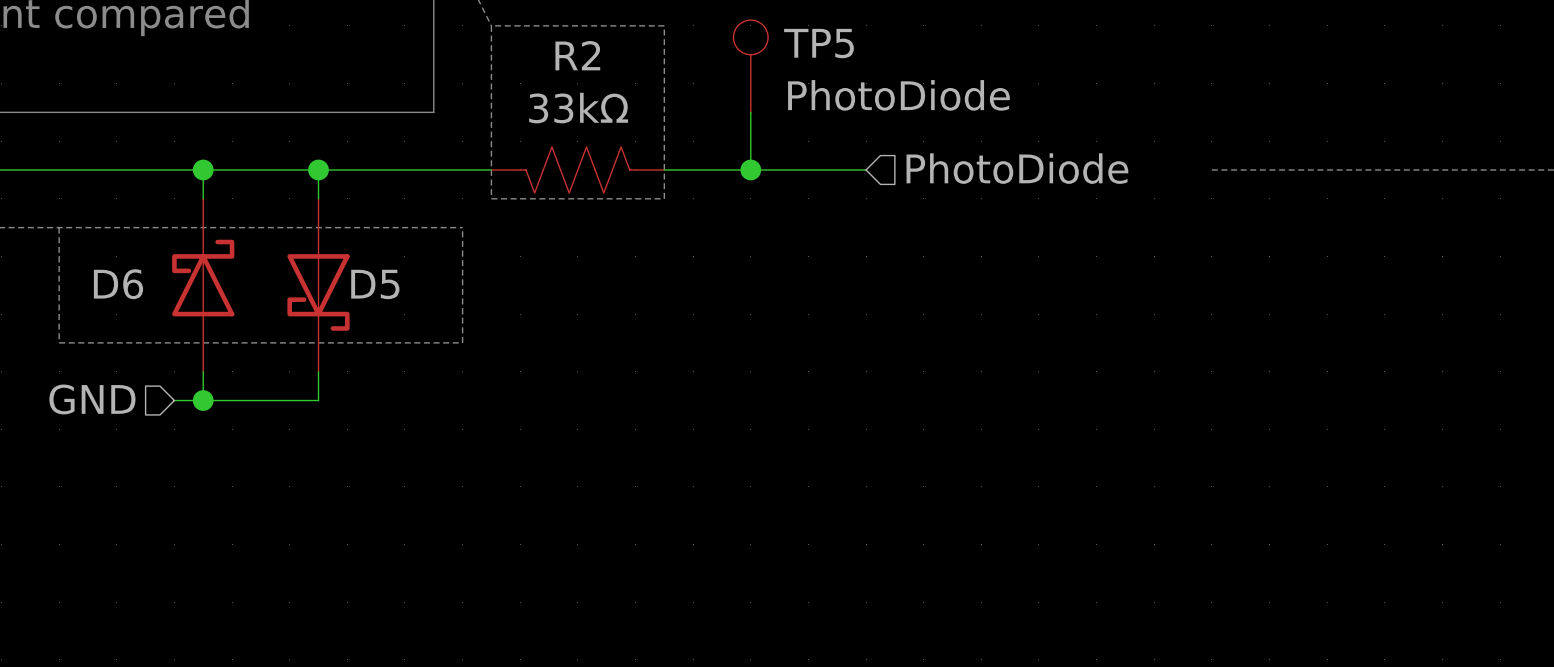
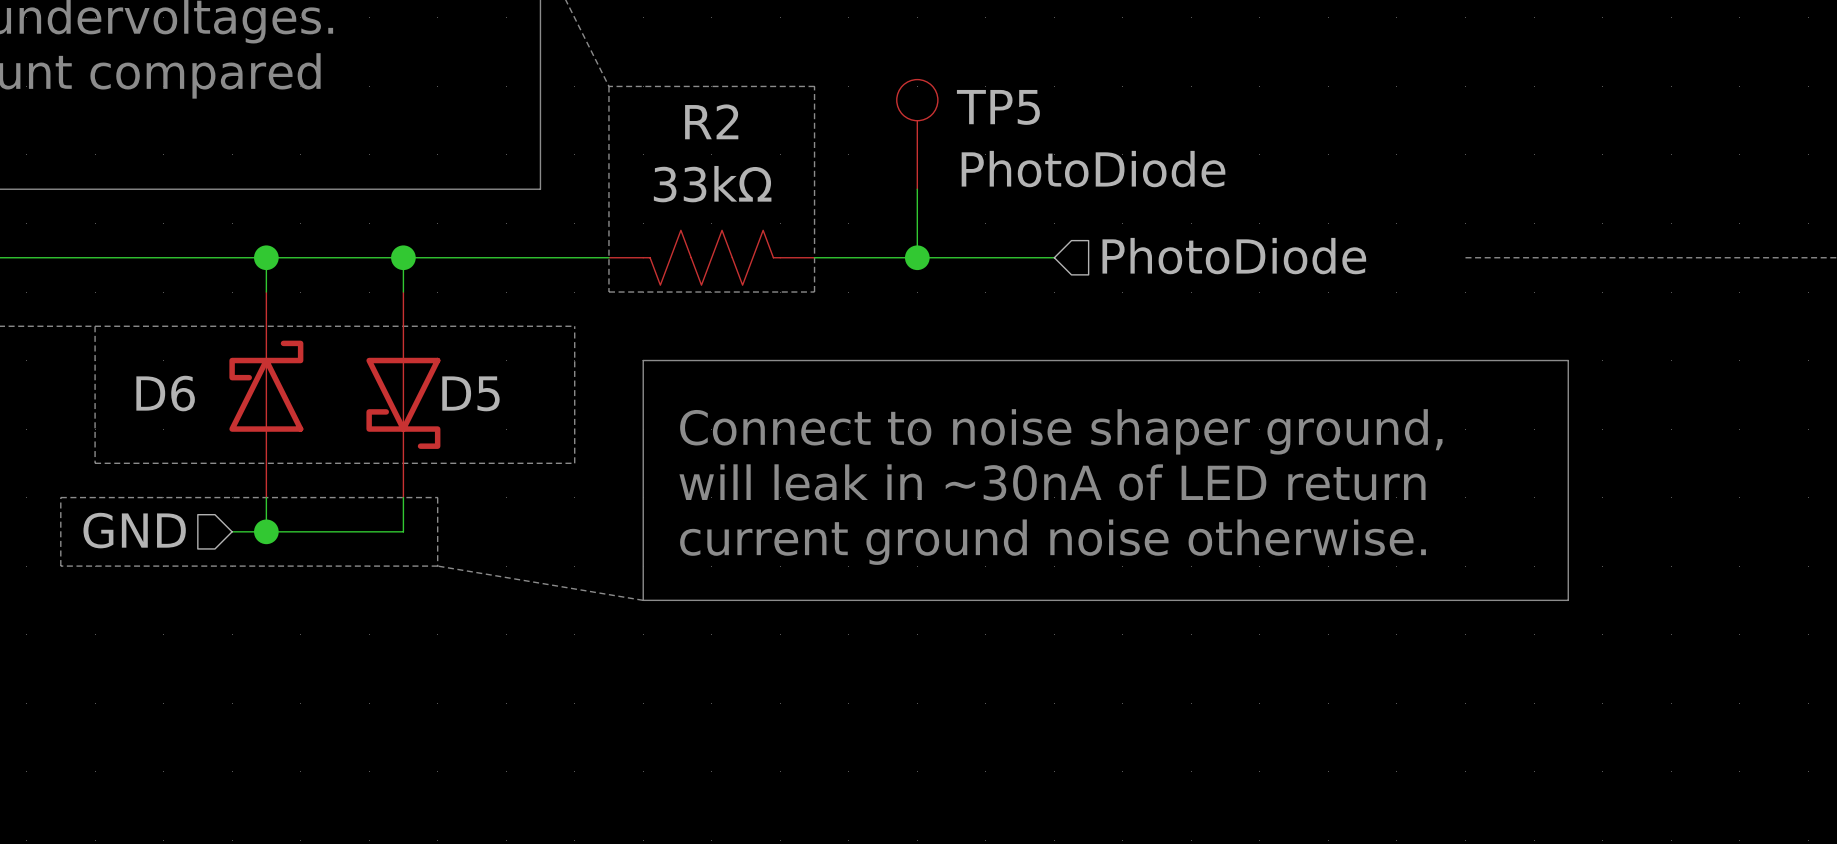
bus: none -> (643, 360) (1568, 360) (1568, 600) (643, 600) (643, 360)
text: none -> Connect to noise shaper ground, (1061, 431)
text: none -> will leak in ~30nA of LED return (1052, 482)
text: none -> current ground noise otherwise. (1053, 542)
line: none -> (437, 566) (437, 497) (60, 497) (60, 566) (437, 566)
line: none -> (437, 566) (643, 600)

